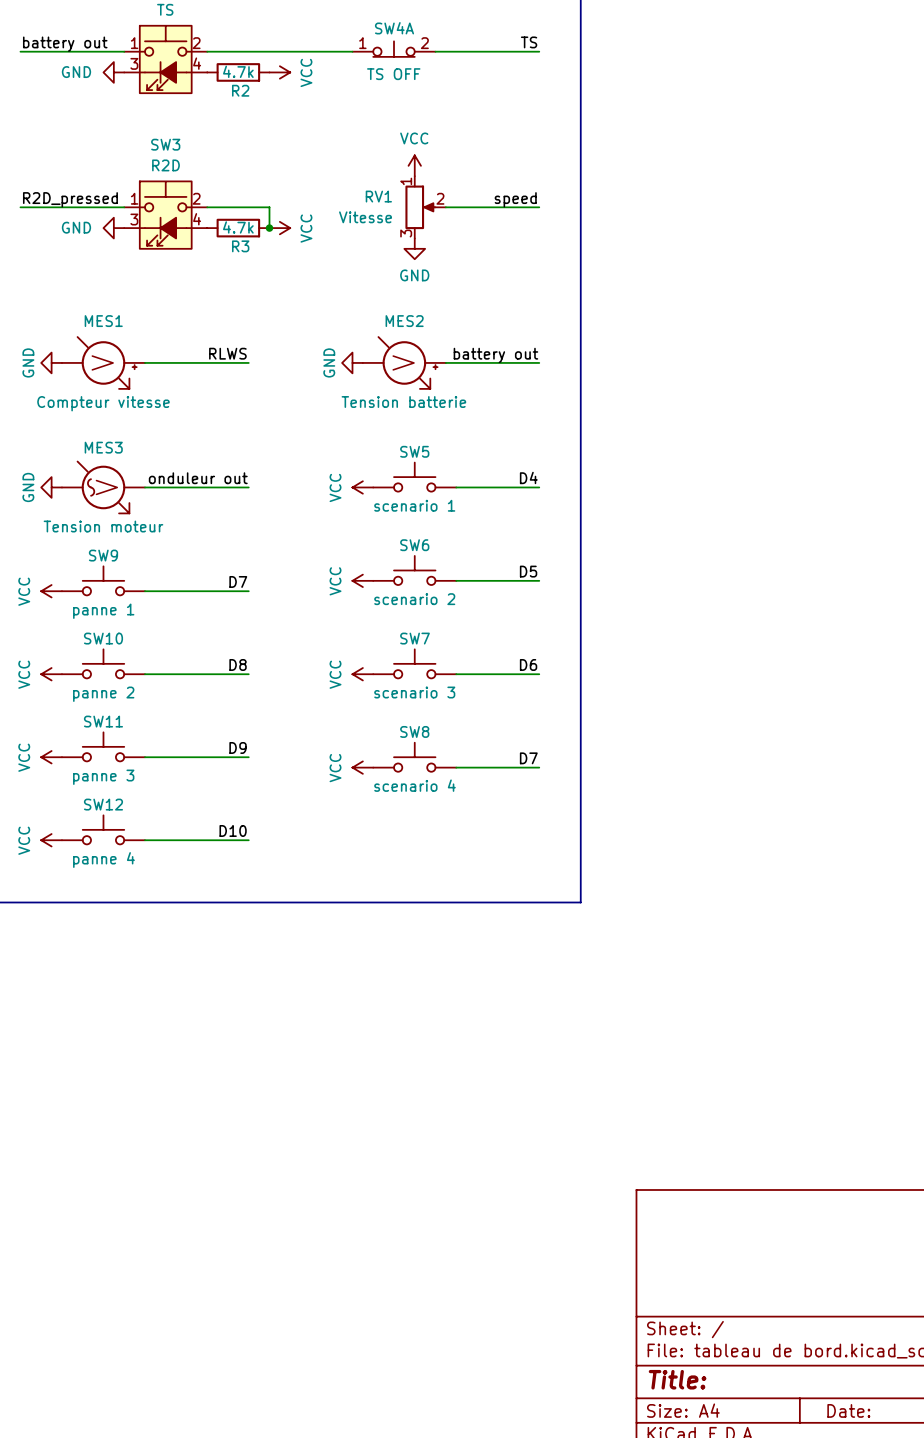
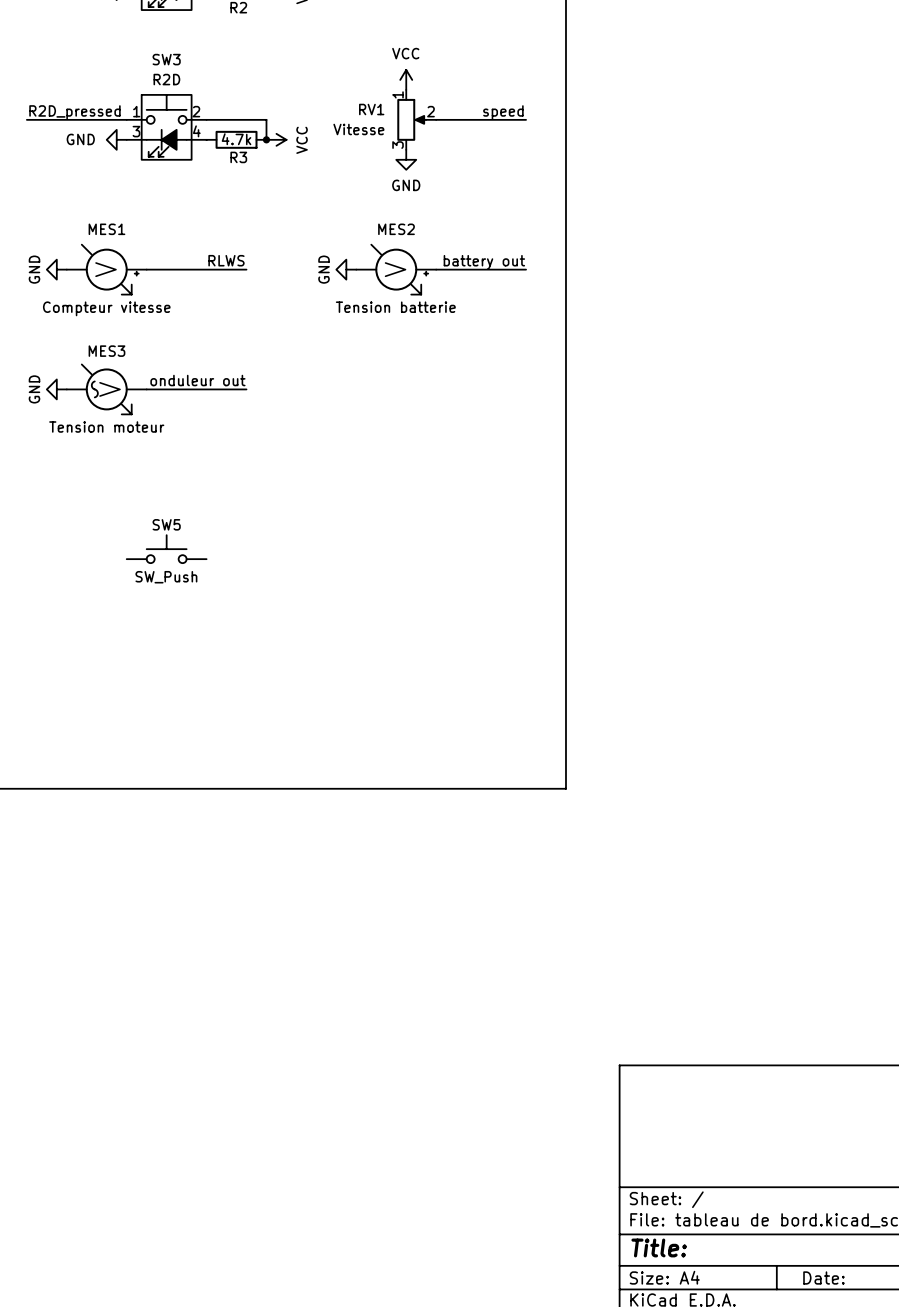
SW5 position: (414, 477) -> (166, 549)
label: D4 (528, 477) -> none
power symbol: VCC (362, 487) -> none
wire: (456, 487) (539, 487) -> none
SW5 value: scenario 1 (414, 505) -> SW_Push (166, 577)
SW6: scenario 2 (414, 570) -> none
label: D5 (528, 571) -> none
SW9: panne 1 (103, 580) -> none
power symbol: VCC (362, 580) -> none
wire: (456, 580) (539, 580) -> none
label: D7 (238, 581) -> none
power symbol: VCC (51, 591) -> none
wire: (144, 591) (248, 591) -> none
SW10: panne 2 (103, 663) -> none
SW7: scenario 3 (414, 663) -> none
label: D8 (238, 664) -> none
label: D6 (528, 664) -> none
power symbol: VCC (51, 674) -> none
wire: (144, 674) (248, 674) -> none
power symbol: VCC (362, 674) -> none
wire: (456, 674) (539, 674) -> none
SW11: panne 3 (103, 746) -> none
label: D9 (238, 747) -> none
power symbol: VCC (51, 757) -> none
wire: (144, 757) (248, 757) -> none
SW8: scenario 4 (414, 757) -> none
label: D7 (528, 758) -> none
power symbol: VCC (362, 767) -> none
wire: (456, 767) (539, 767) -> none
SW12: panne 4 (103, 829) -> none
label: D10 (233, 830) -> none
power symbol: VCC (51, 840) -> none
wire: (144, 840) (248, 840) -> none

